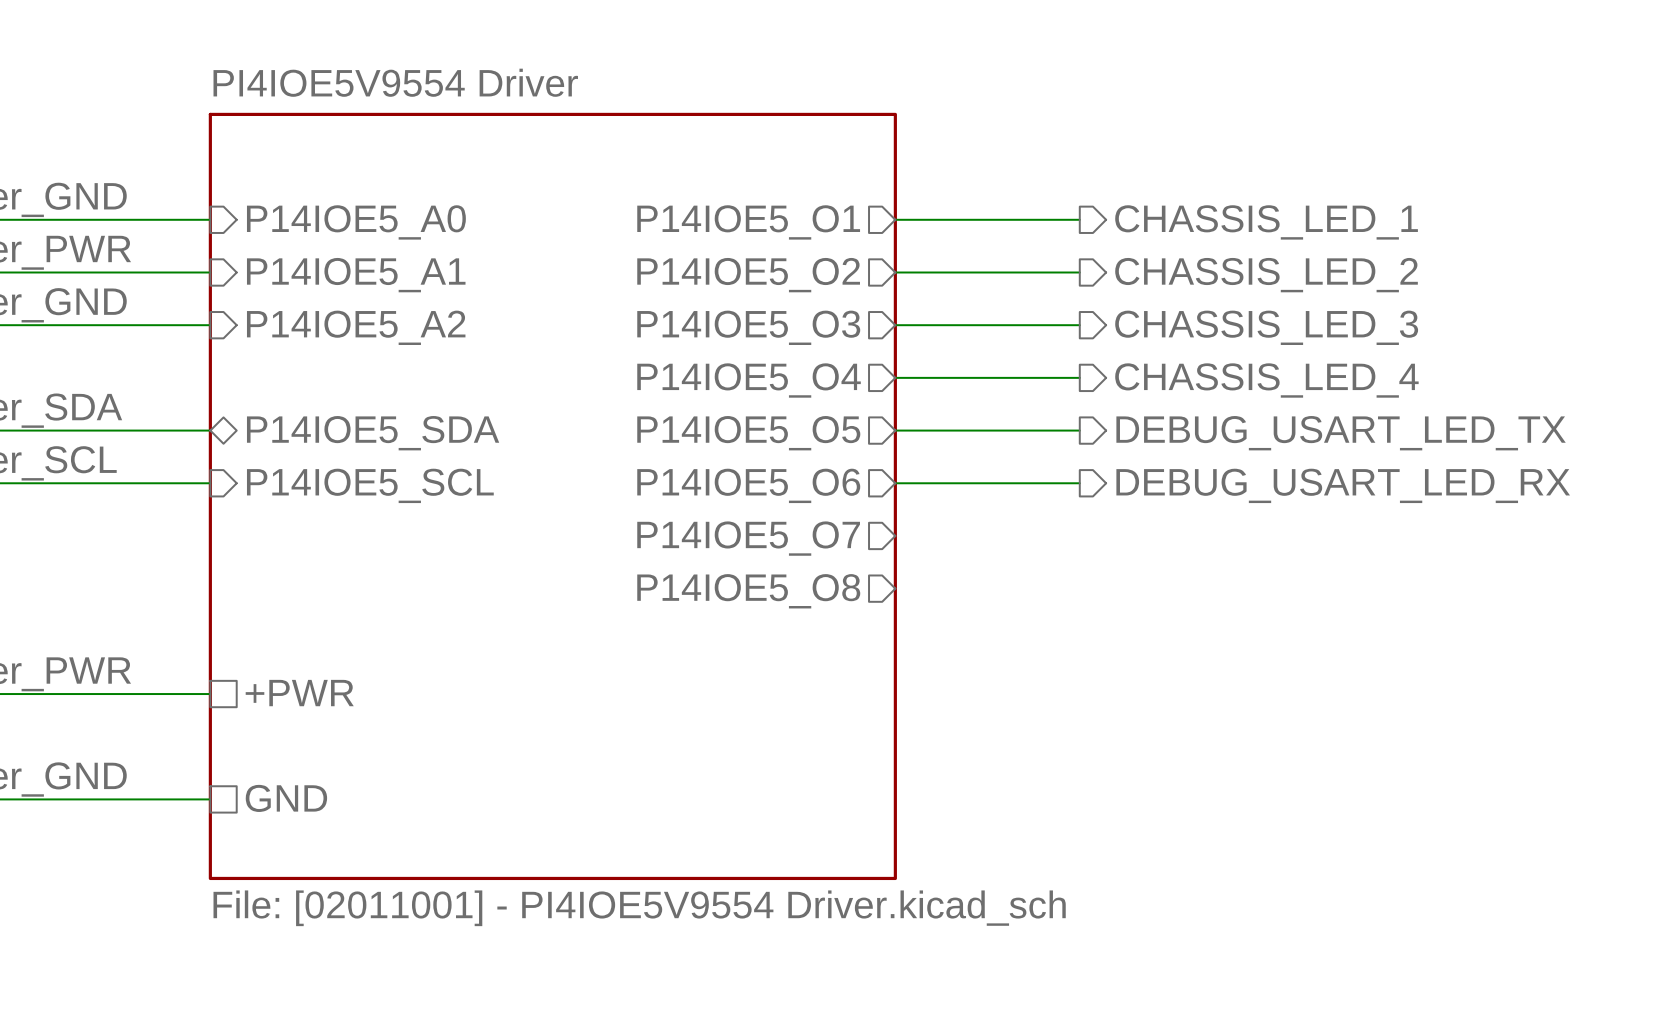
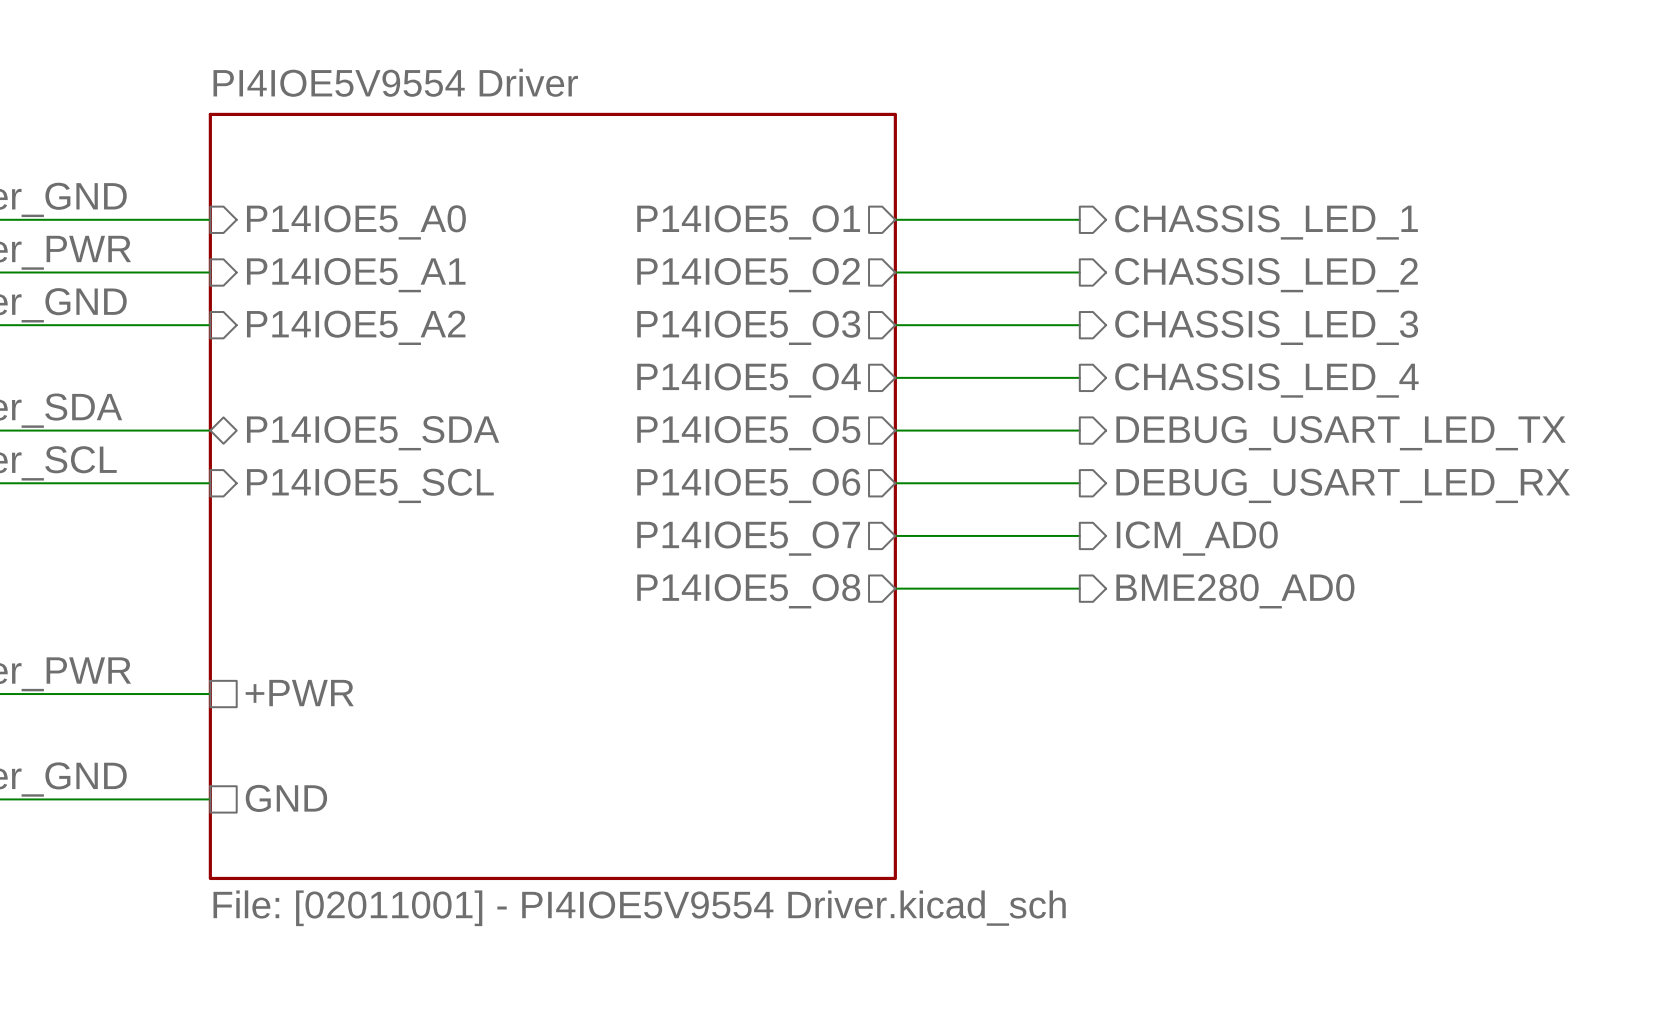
wire: none -> (895, 535) (1079, 535)
hierarchical label: none -> ICM_AD0 (1197, 538)
wire: none -> (895, 588) (1079, 588)
hierarchical label: none -> BME280_AD0 (1235, 591)

